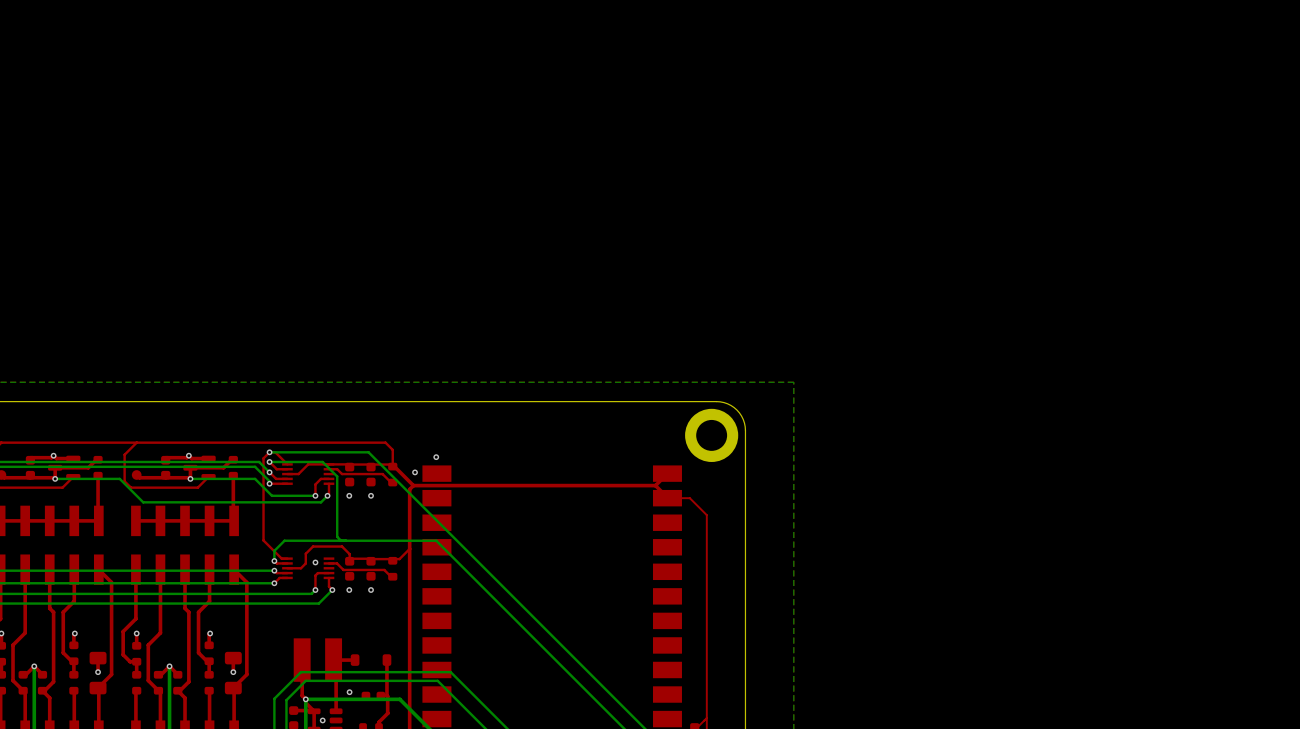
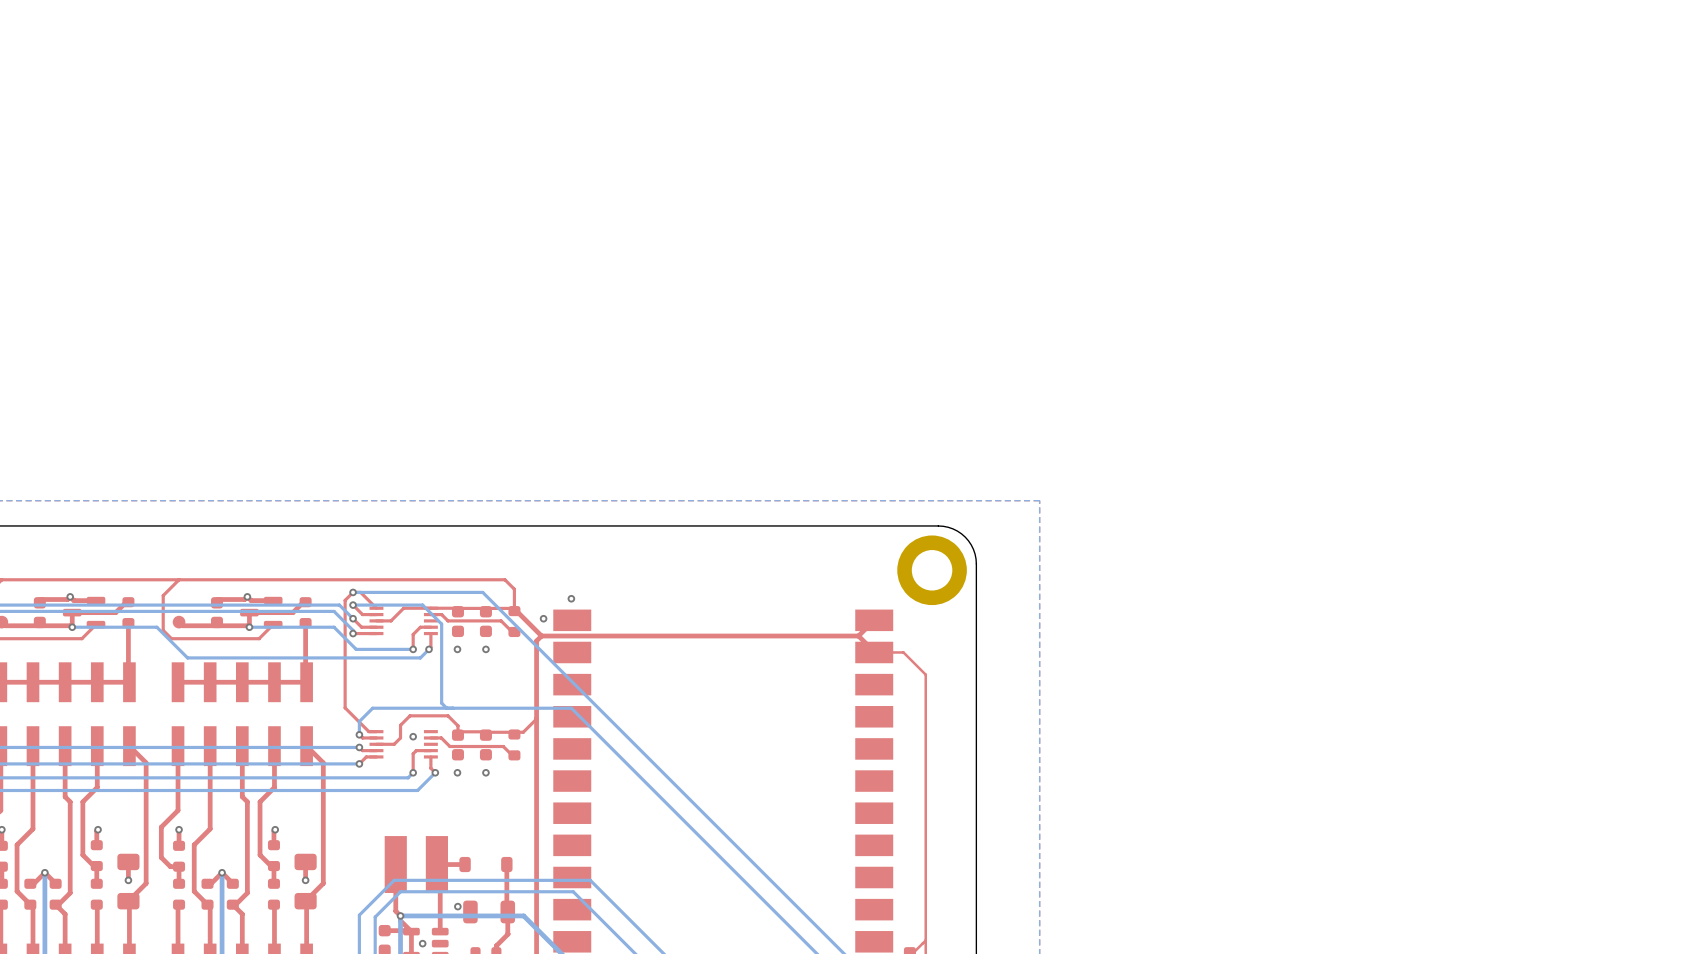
part footprint: [361, 691, 386, 701] -> [463, 900, 516, 924]

